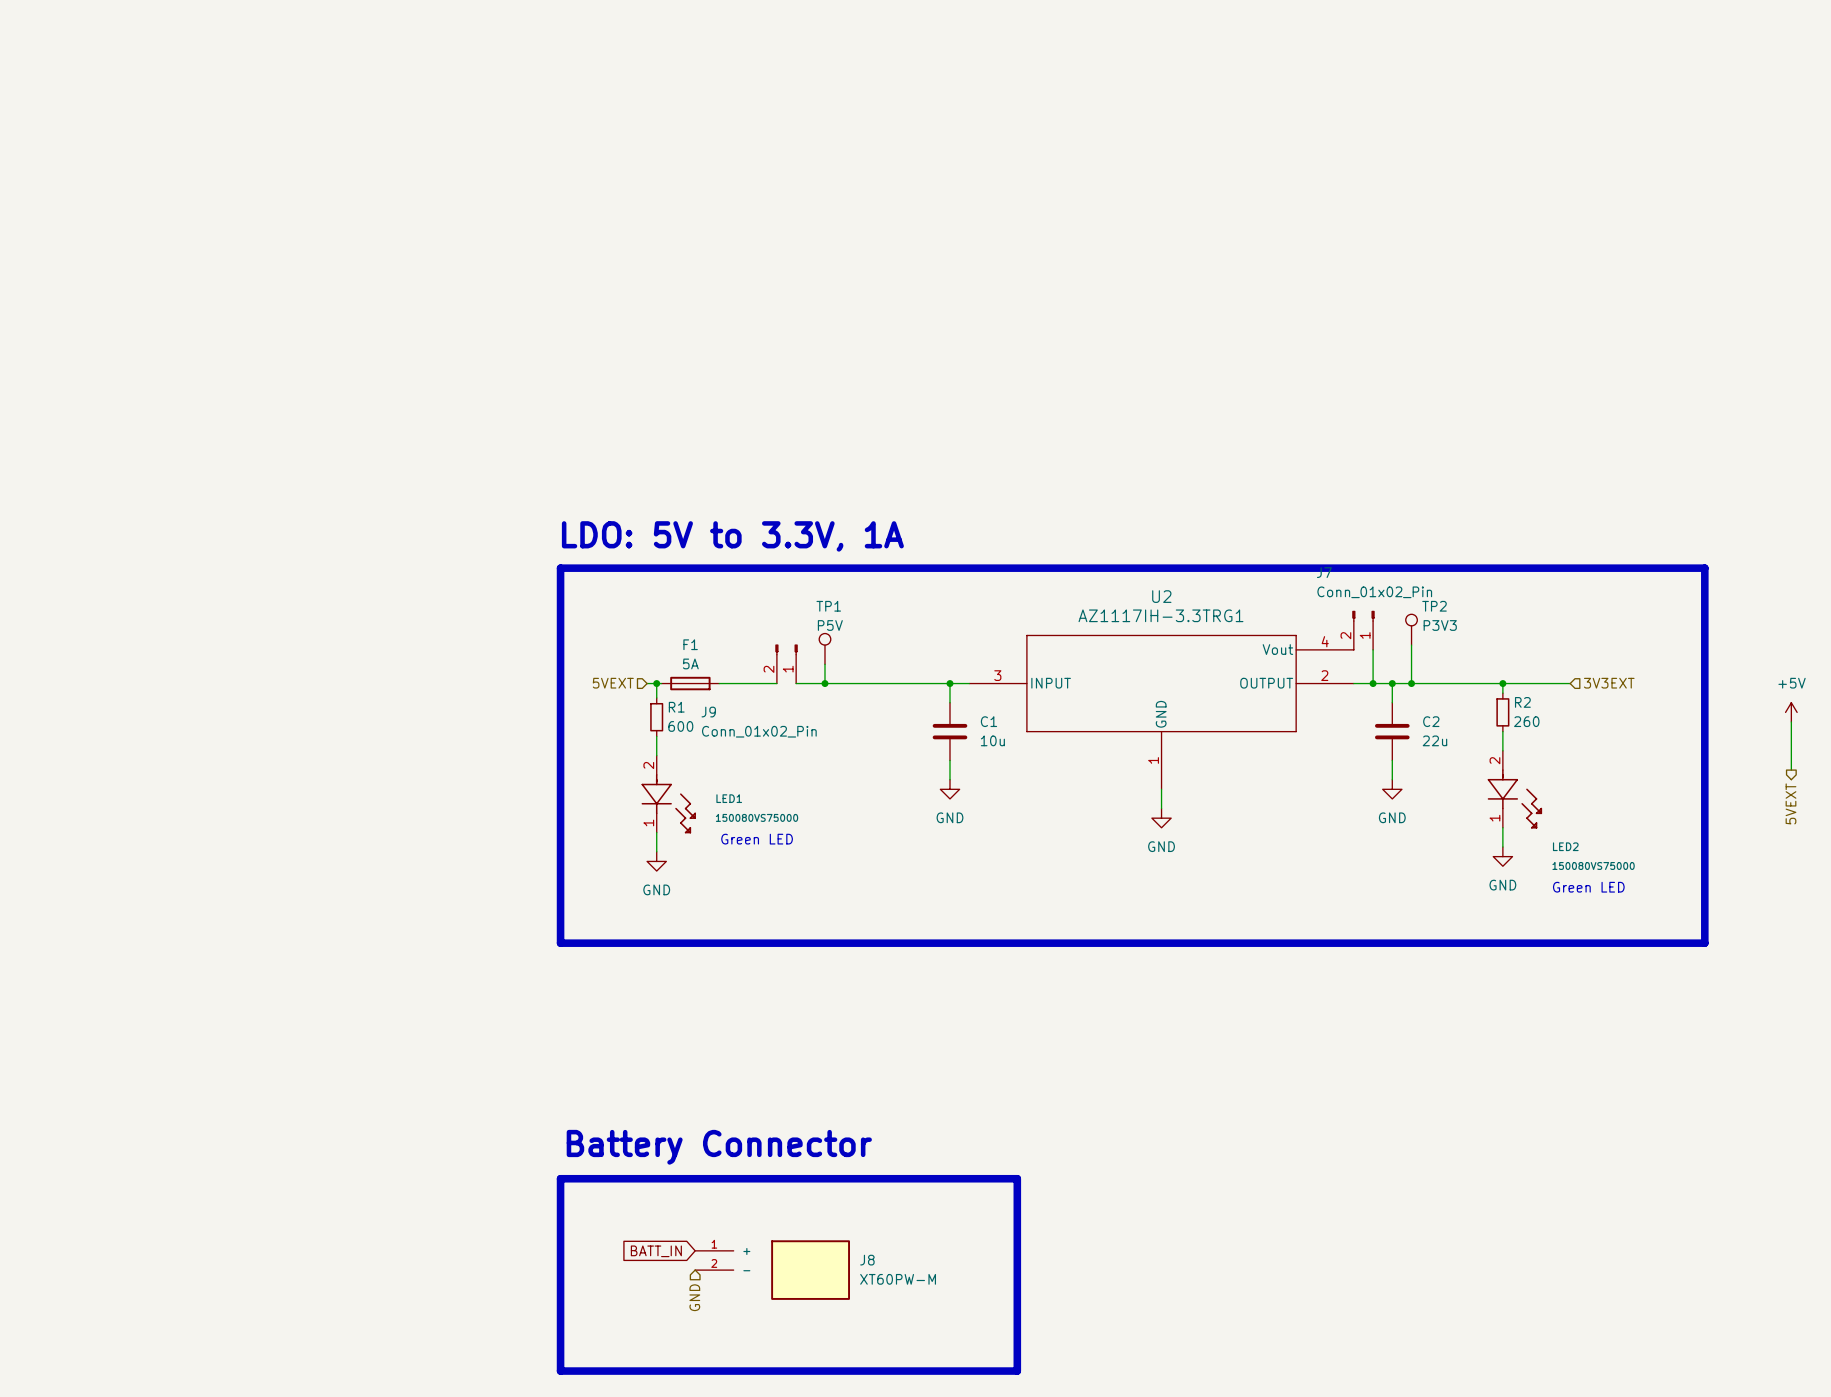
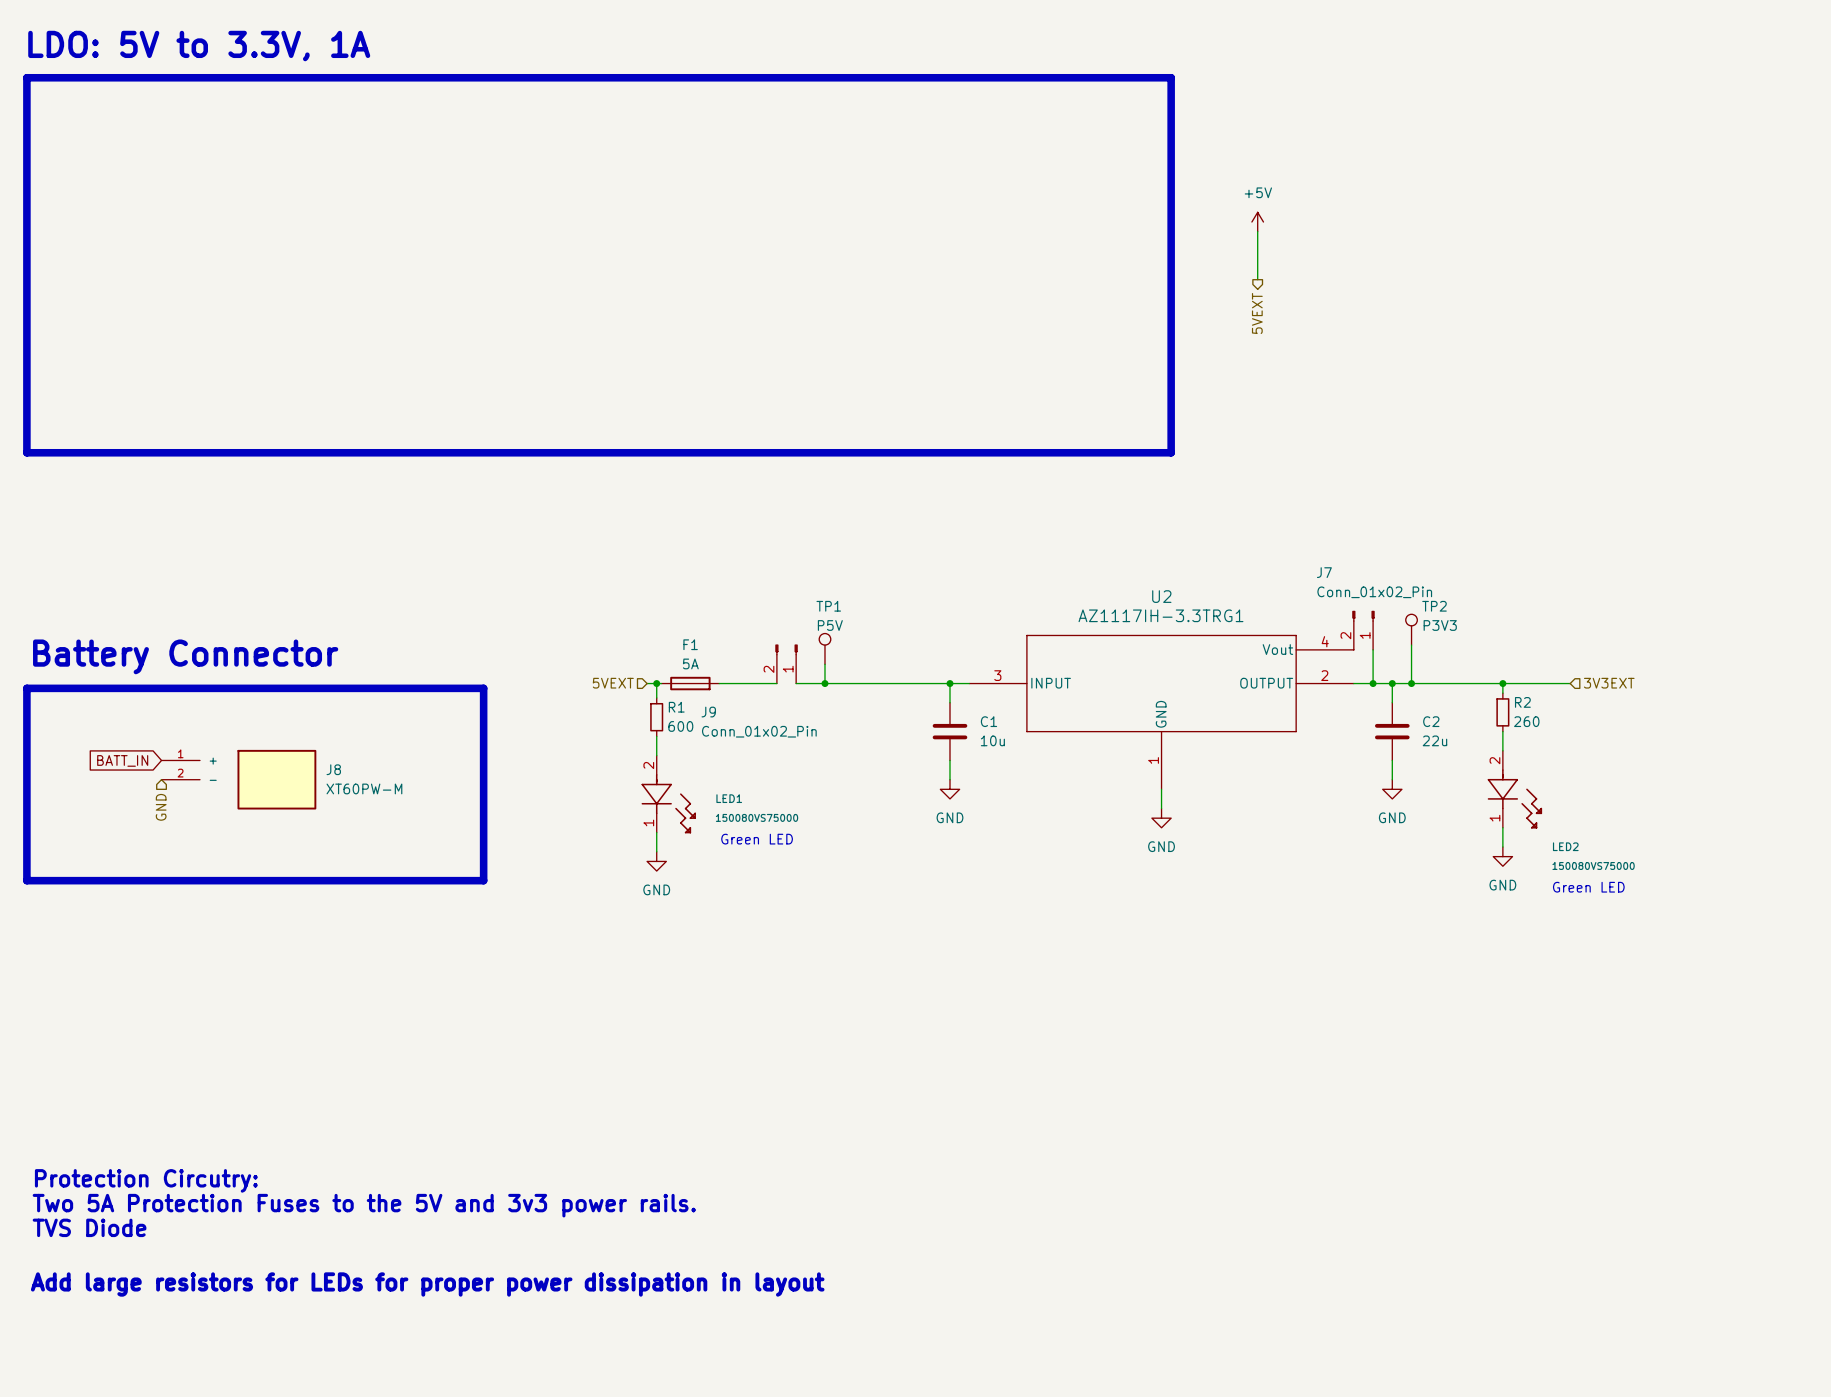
text: none -> LDO: 5V to 3.3V, 1A (199, 46)
line: none -> (26, 77) (1171, 77) (1171, 452) (26, 452) (26, 77)
power symbol: none -> +5V (1257, 222)
wire: none -> (1257, 231) (1257, 279)
hierarchical label: none -> 5VEXT (1257, 313)
text: LDO: 5V to 3.3V, 1A (732, 536) -> none
line: (560, 568) (1704, 568) (1704, 943) (560, 943) (560, 568) -> none
text: none -> Battery Connector (185, 656)
line: none -> (26, 688) (26, 880) (483, 880) (483, 688) (26, 688)
power symbol: +5V (1791, 712) -> none
wire: (1791, 722) (1791, 770) -> none
global label: none -> BATT_IN (122, 760)
hierarchical label: 5VEXT (1790, 803) -> none
hierarchical label: none -> GND (161, 807)
text: Battery Connector (719, 1147) -> none
line: (560, 1178) (560, 1371) (1017, 1371) (1017, 1178) (560, 1178) -> none
text: none -> Protection Circutry: (146, 1180)
text: none -> Two 5A Protection Fuses to the 5V and 3v3 power rails. (364, 1205)
text: none -> TVS Diode (89, 1227)
global label: BATT_IN (656, 1251) -> none
J8 position: (772, 1270) -> (238, 779)
text: none -> Add large resistors for LEDs for proper power dissipation in layout (427, 1284)
hierarchical label: GND (694, 1297) -> none

